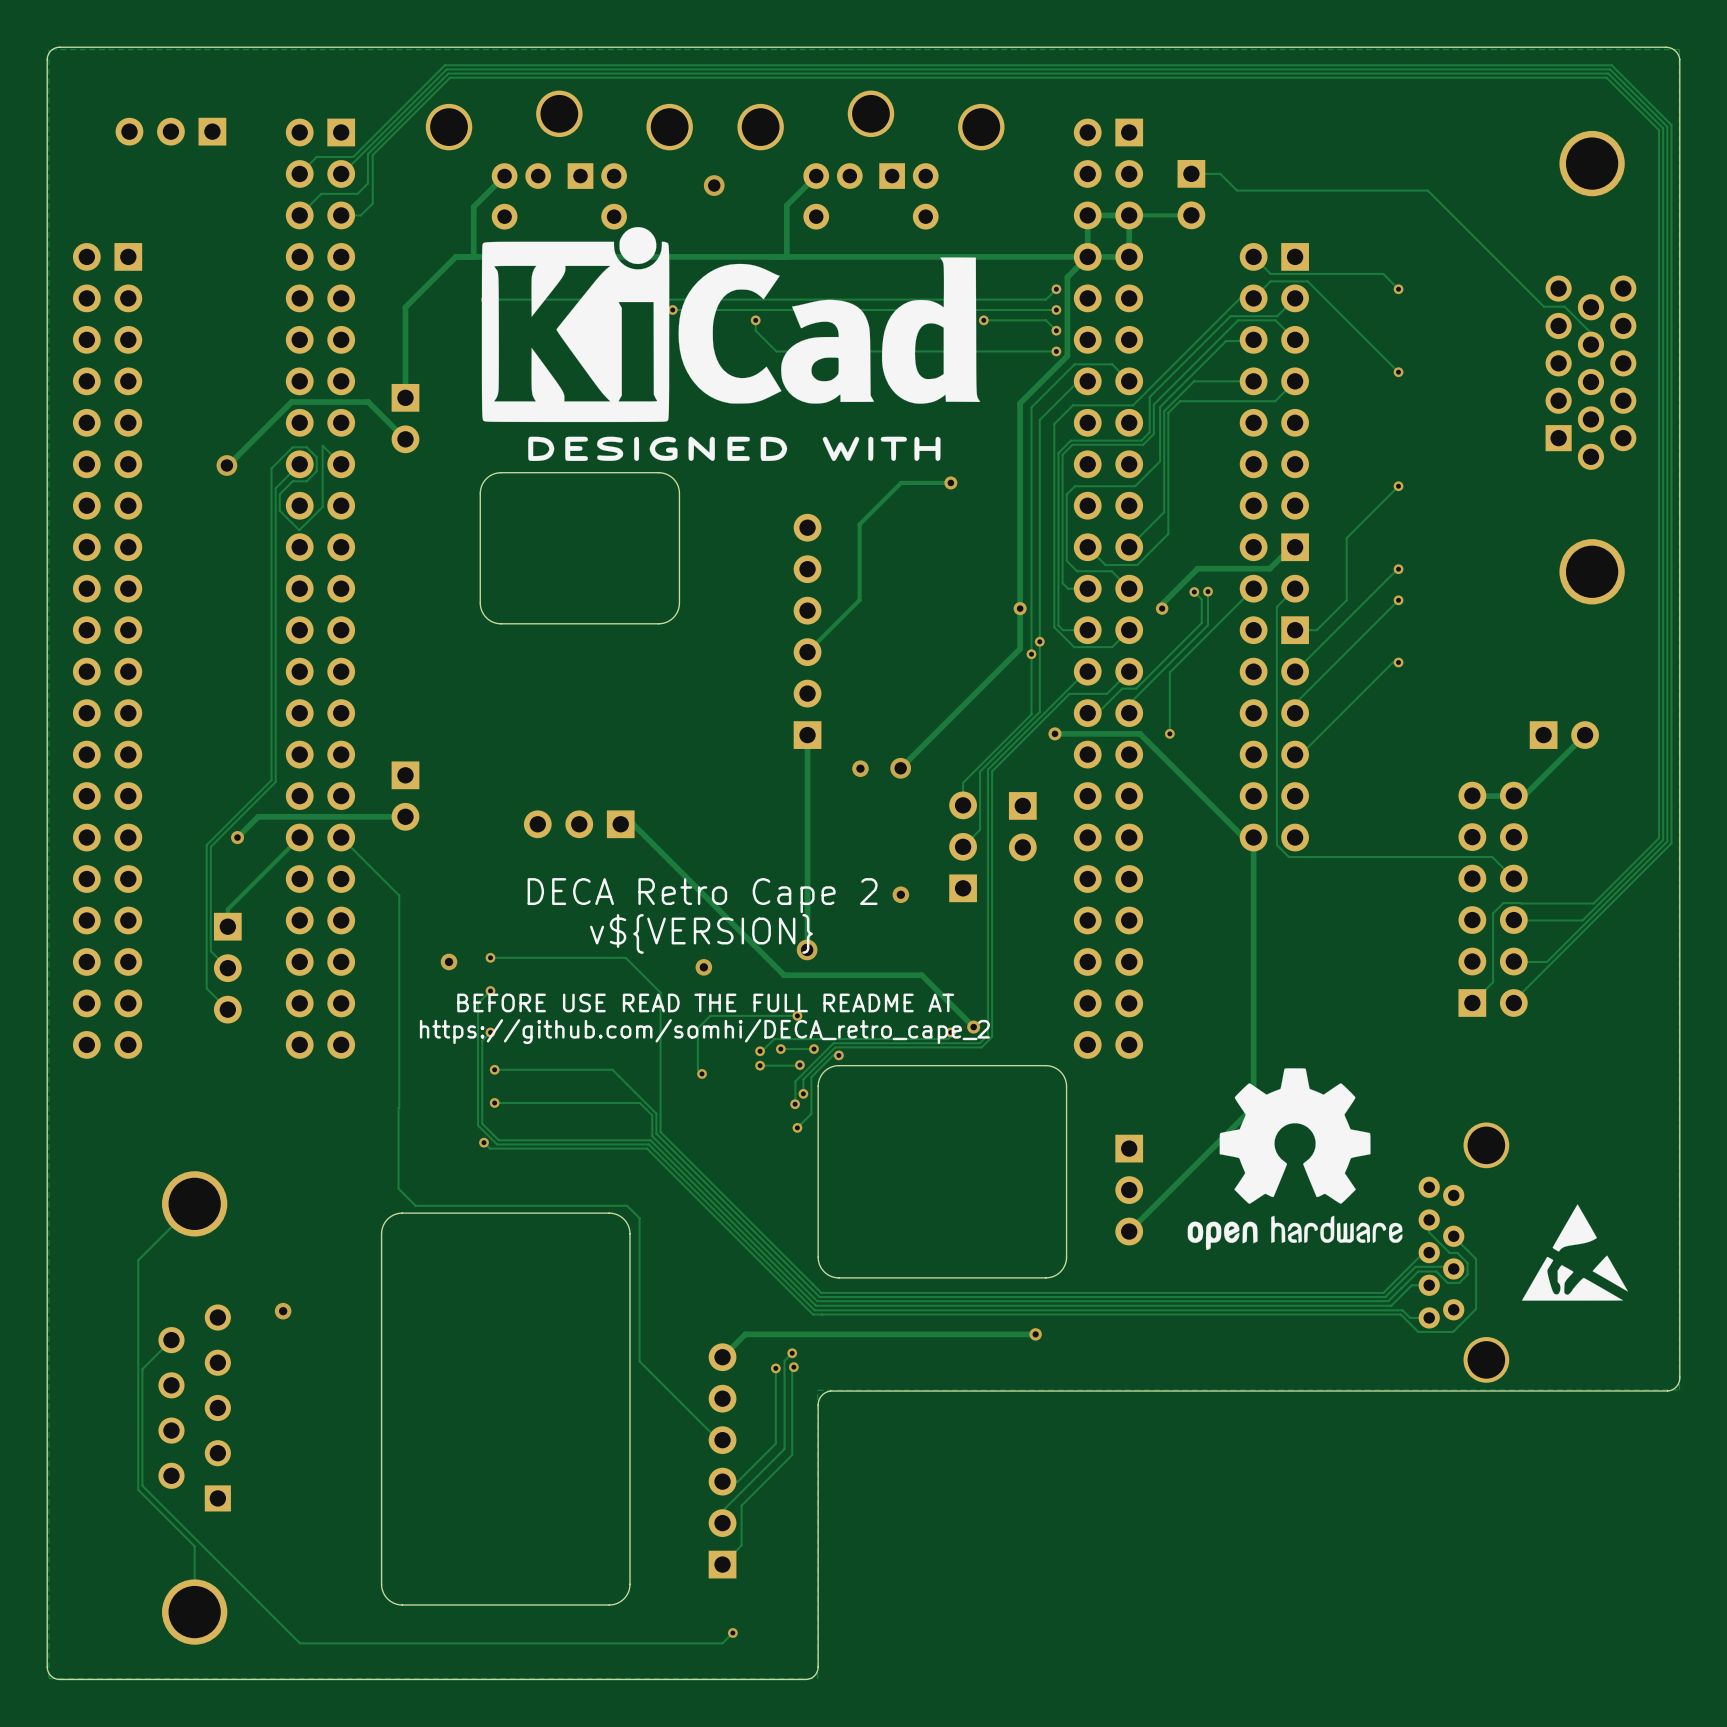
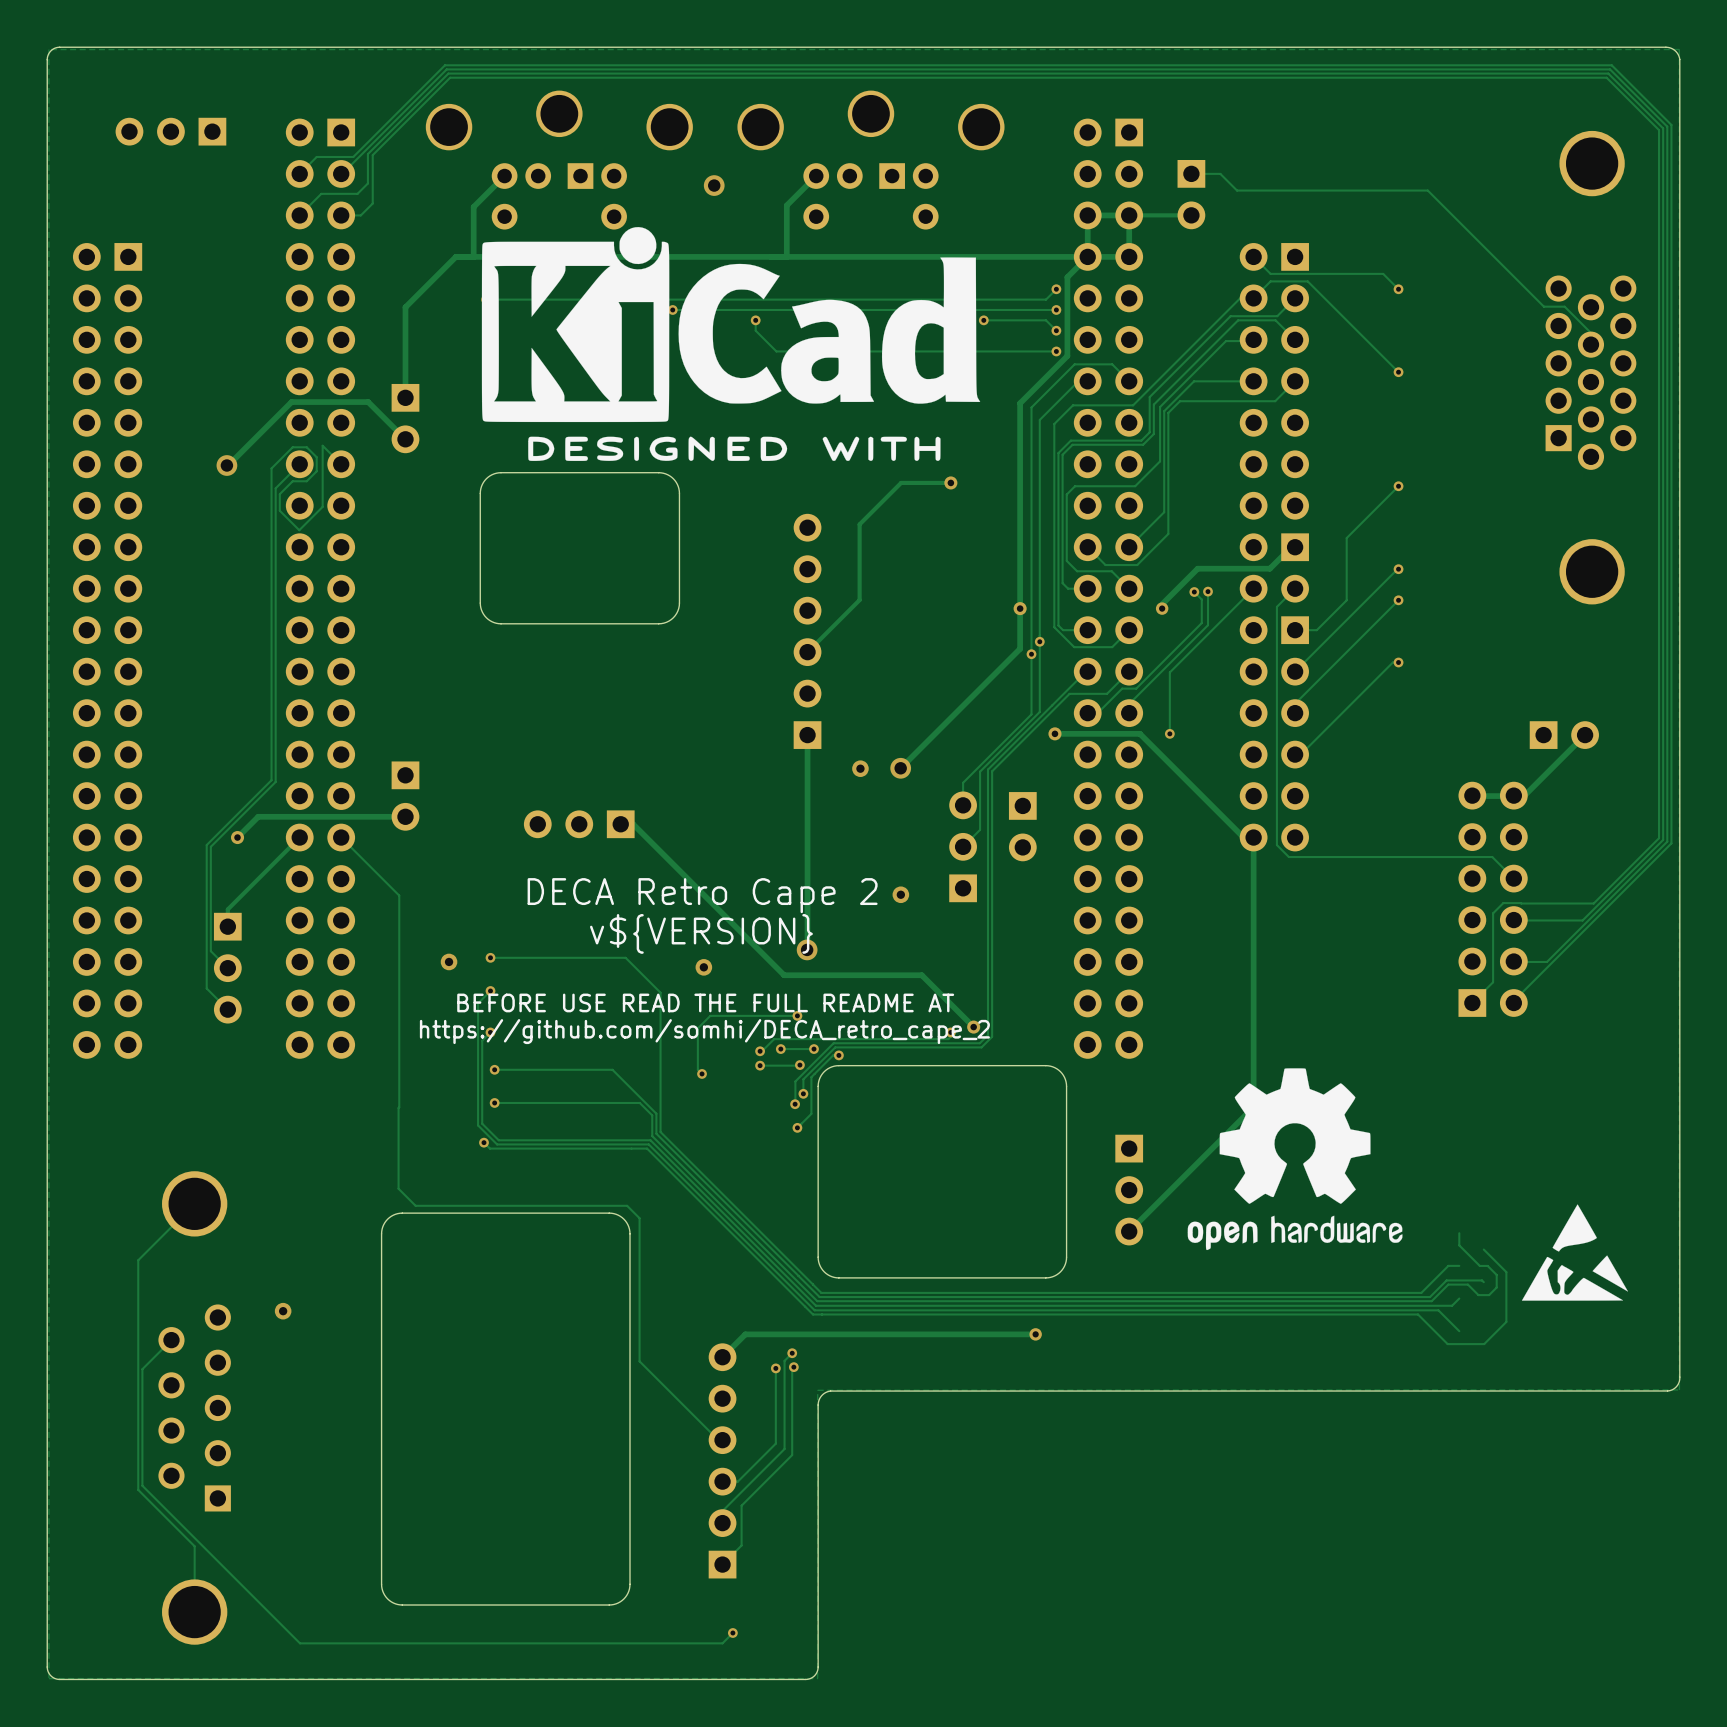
track: (1429, 1220) (1429, 1232) (1449, 1252) (1457, 1252) (1467, 1263) (1467, 1274) (1459, 1282) (1447, 1282) (1436, 1271) (1418, 1271) (1388, 1301) -> (1459, 1233) (1459, 1245) (1479, 1265) (1487, 1265) (1496, 1274) (1496, 1287) (1489, 1295) (1478, 1295) (1467, 1284) (1448, 1284) (1431, 1301) (1388, 1301)
track: (1453, 1236) (1476, 1259) (1476, 1308) (1453, 1331) (1418, 1331) (1400, 1314) -> (1483, 1249) (1506, 1272) (1506, 1321) (1484, 1344) (1447, 1344) (1418, 1314) (1400, 1314)
track: (1429, 1252) (1423, 1252) (1383, 1292) -> (1459, 1265) (1448, 1265) (1421, 1292) (1383, 1292)
part: (1463, 1252) -> none
track: (1453, 1269) (1451, 1266) (1415, 1266) (1385, 1297) -> (1483, 1282) (1482, 1280) (1446, 1280) (1430, 1297) (1385, 1297)
track: (1429, 1285) (1411, 1285) (1391, 1305) -> (1459, 1298) (1452, 1305) (1391, 1305)
track: (1402, 1310) (1410, 1317) (1430, 1317) -> (1402, 1310) (1438, 1310) (1459, 1331)

